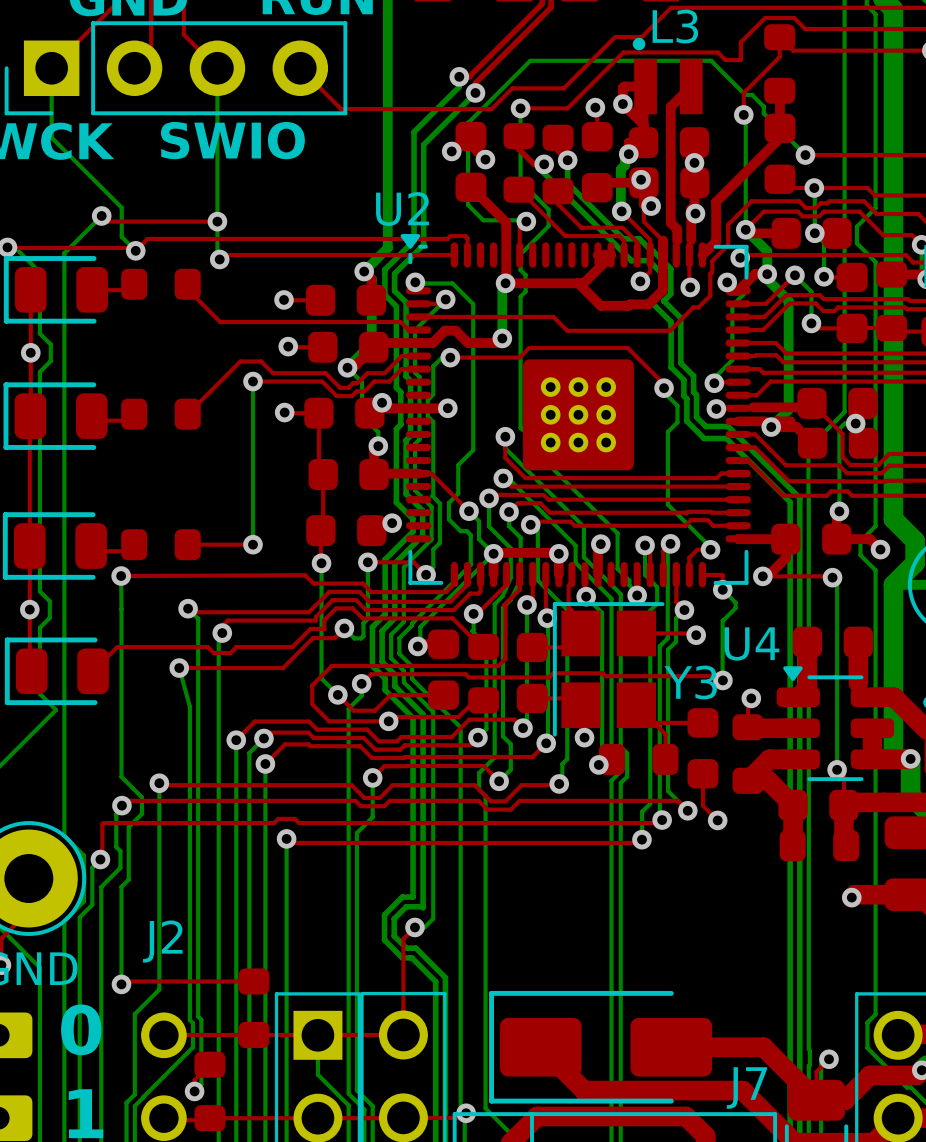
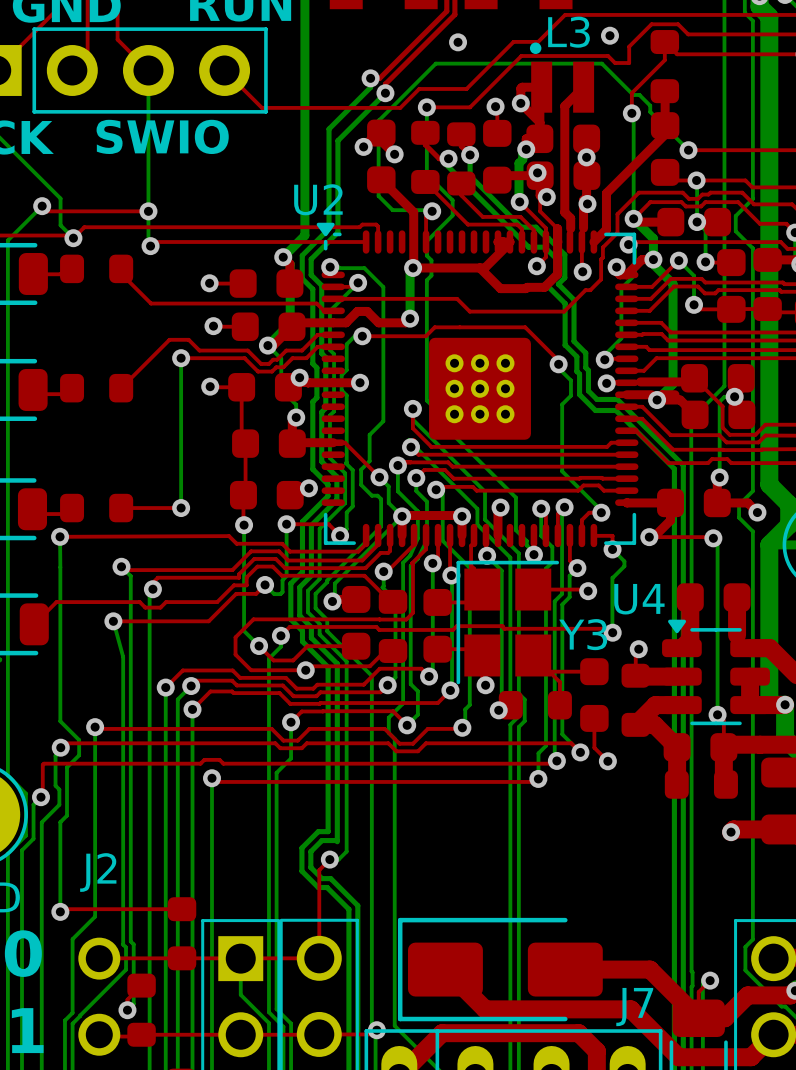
via: none -> (609, 35)
via: none -> (458, 42)

